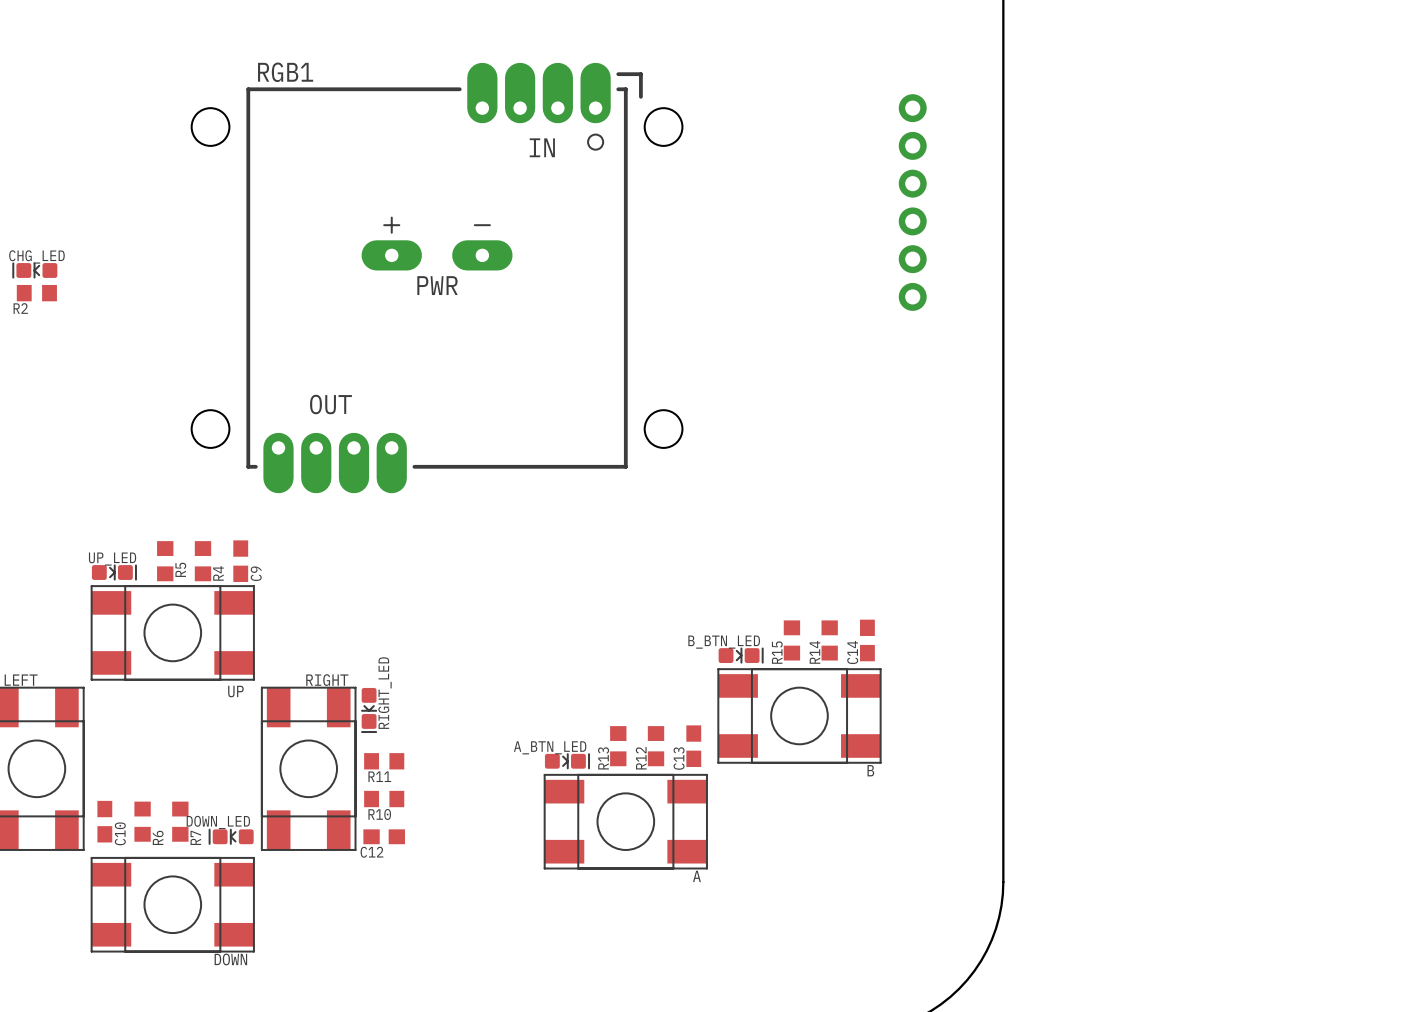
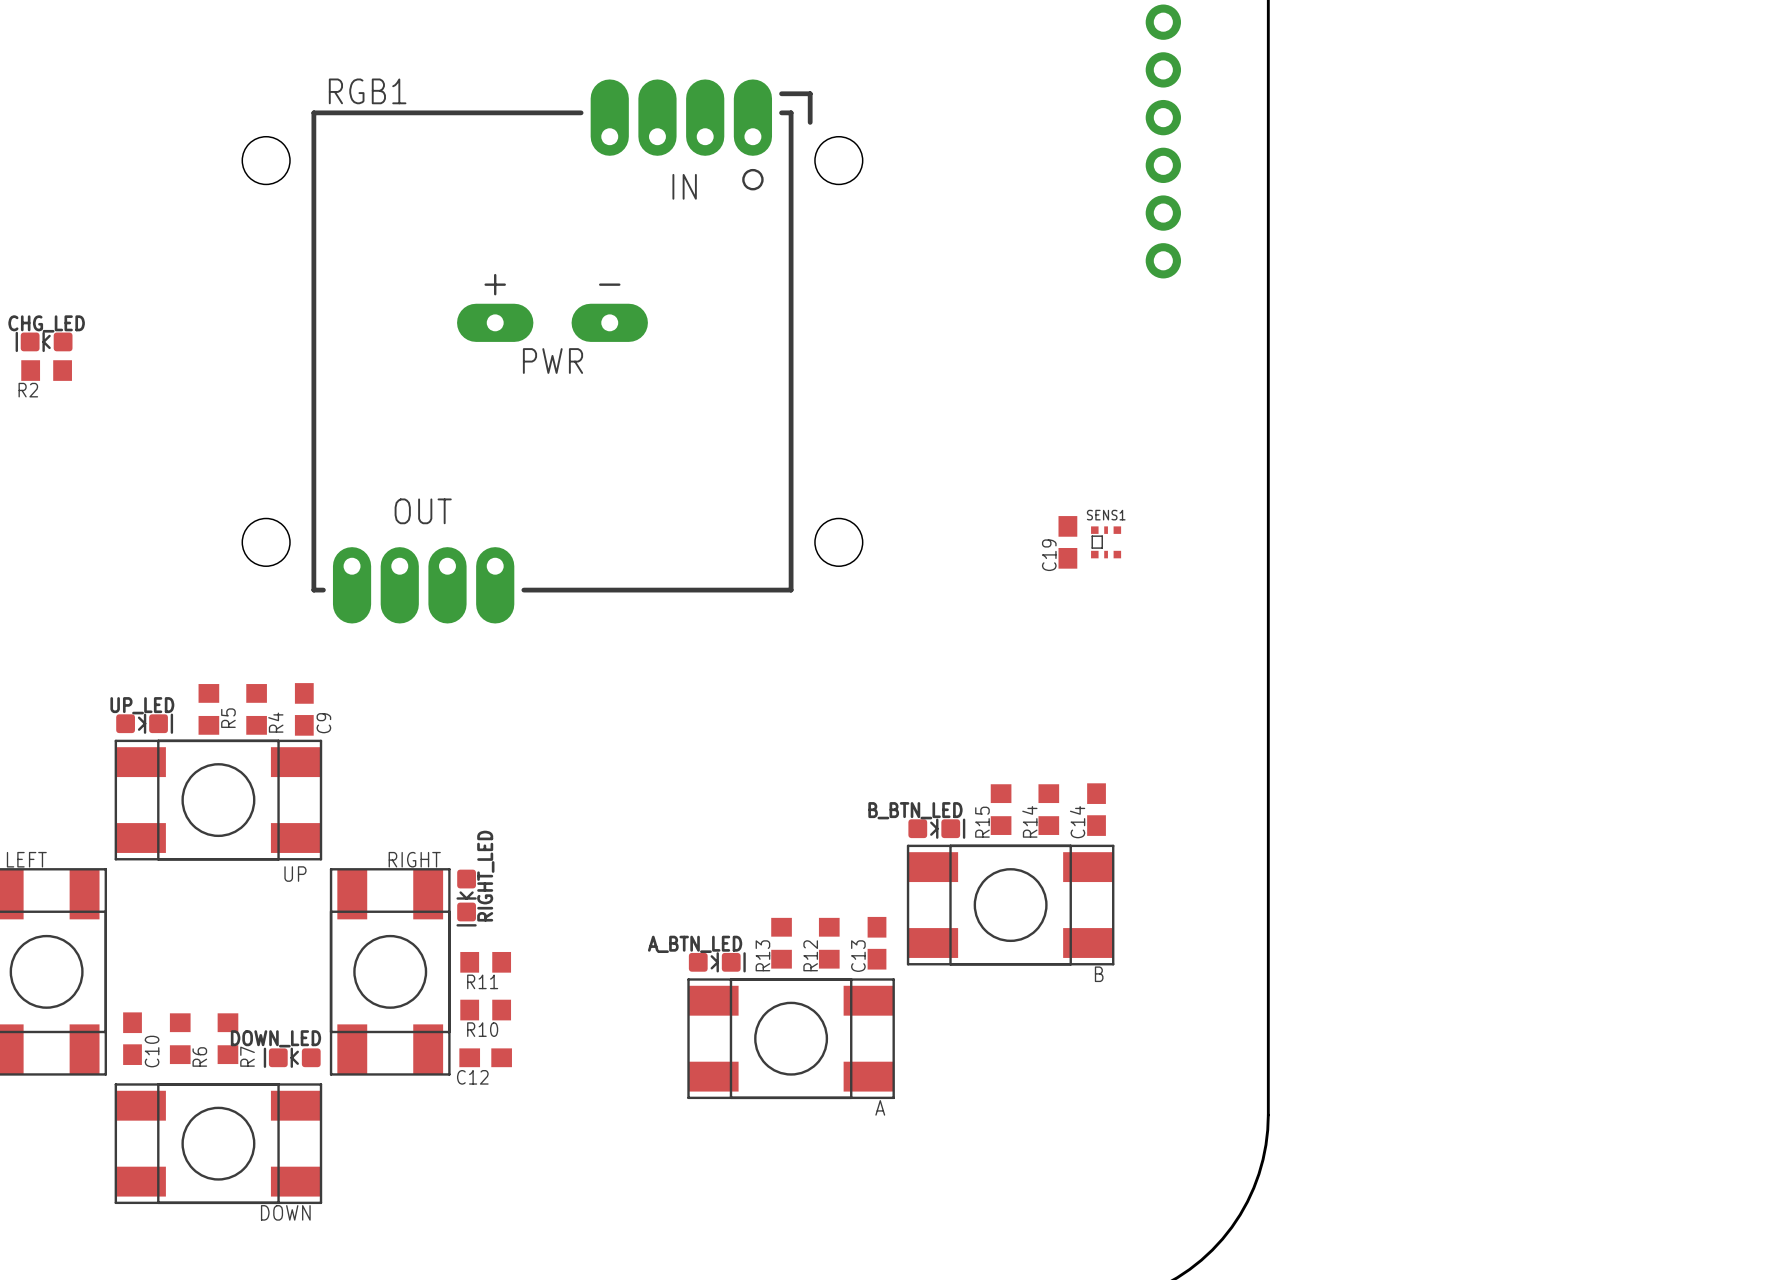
part position: (912, 202) -> (1163, 141)
C19: none -> (1067, 542)
SENS1: none -> (1106, 542)

